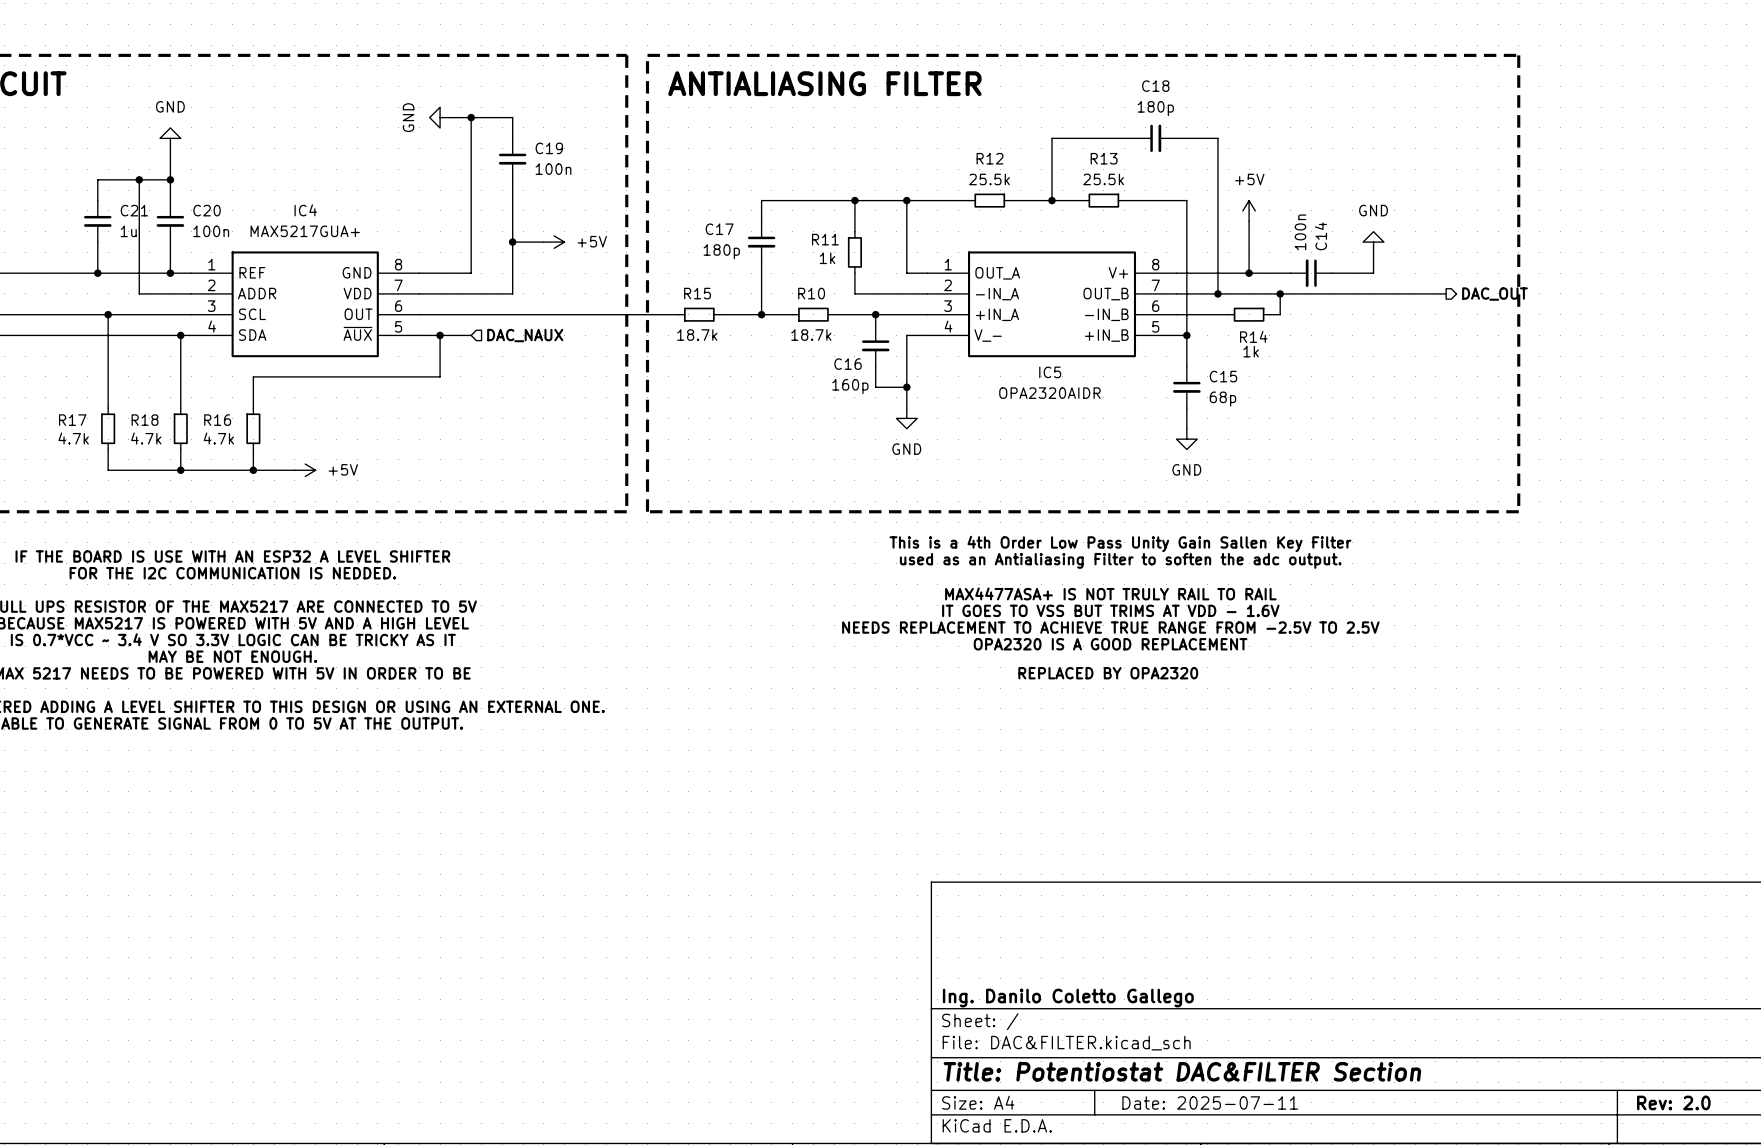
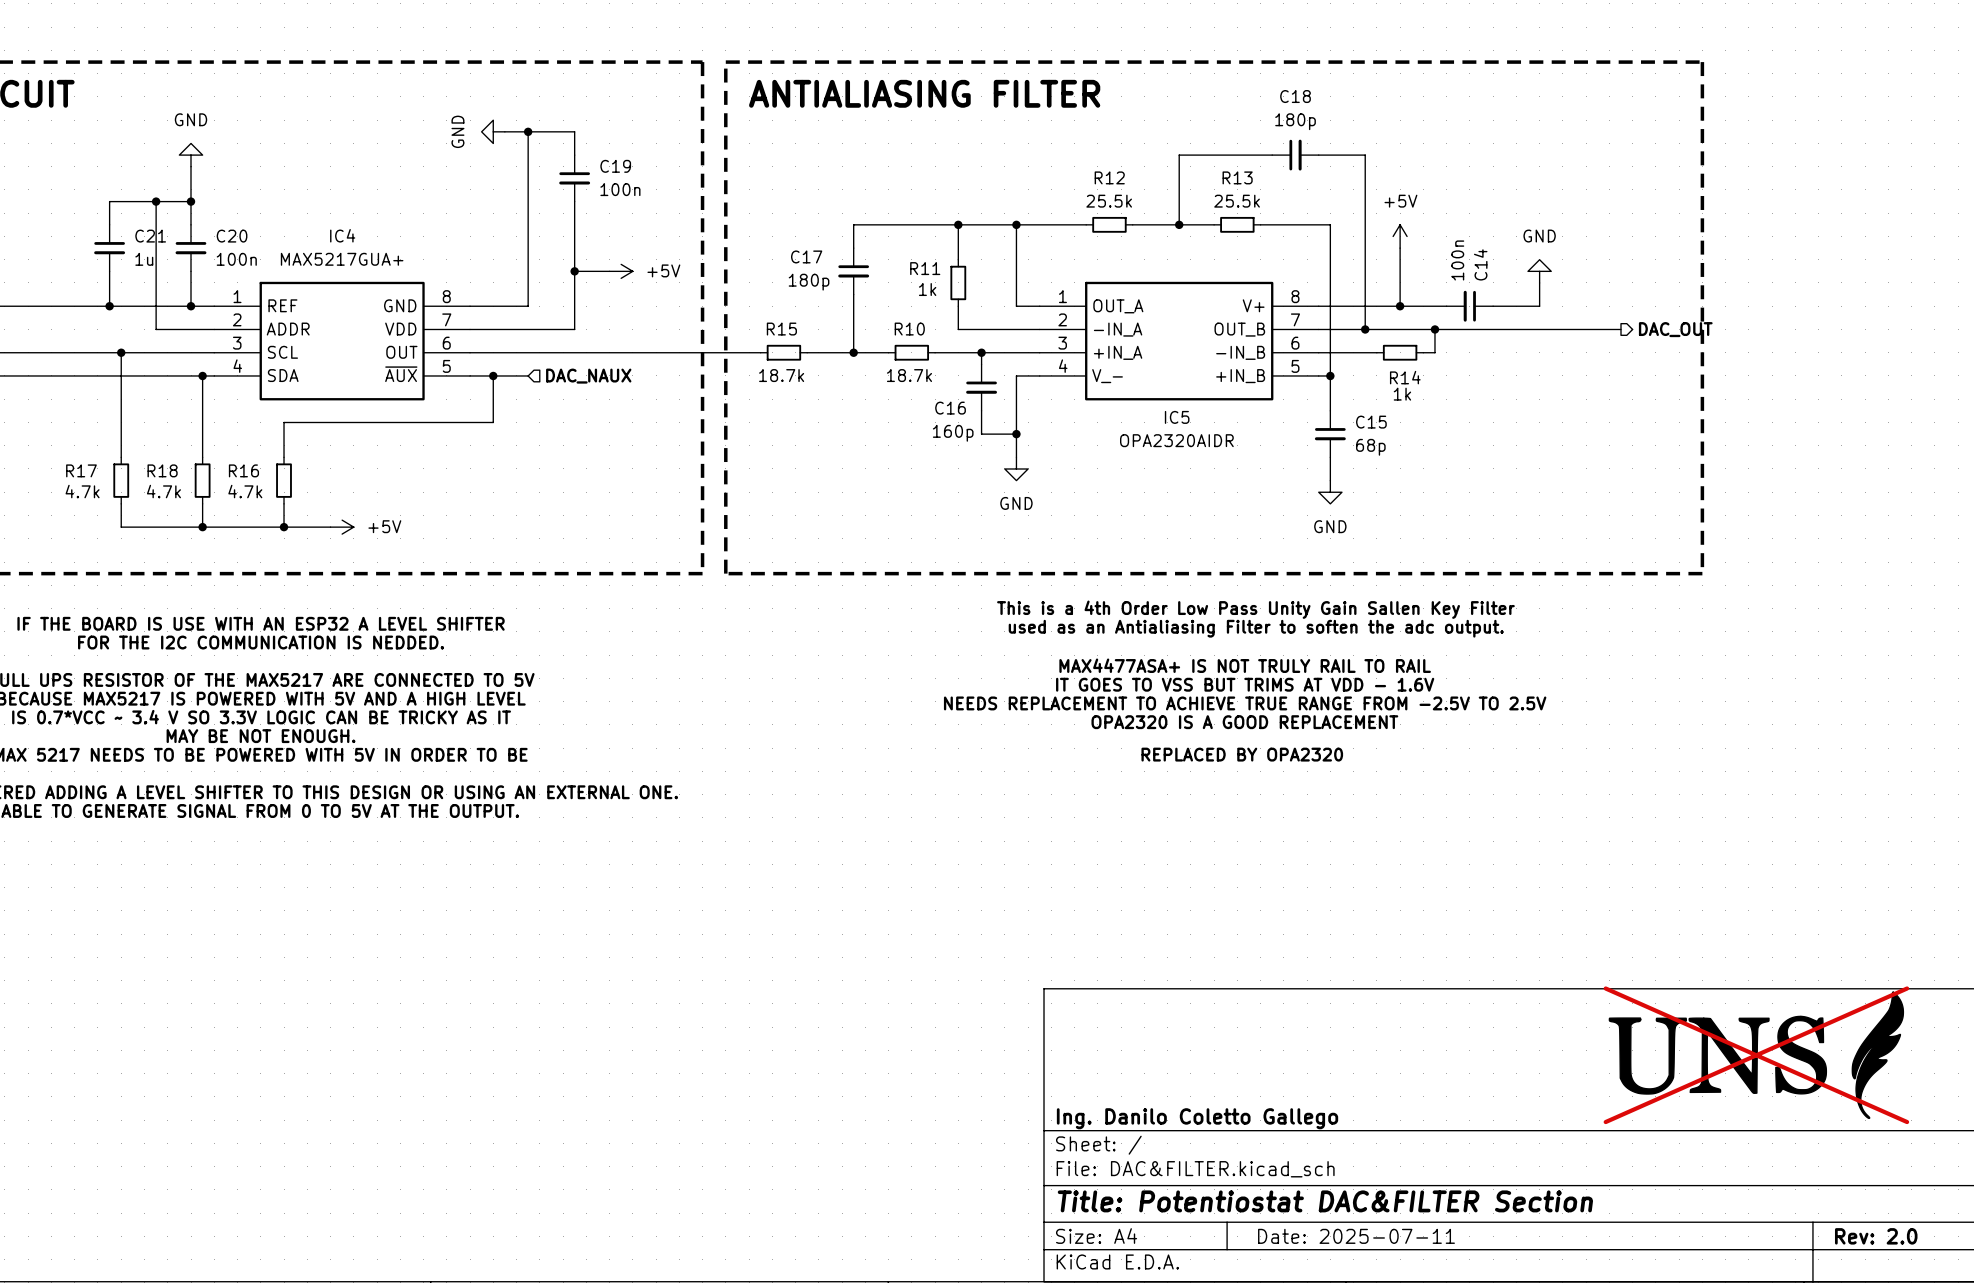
part: none -> (1756, 1055)

